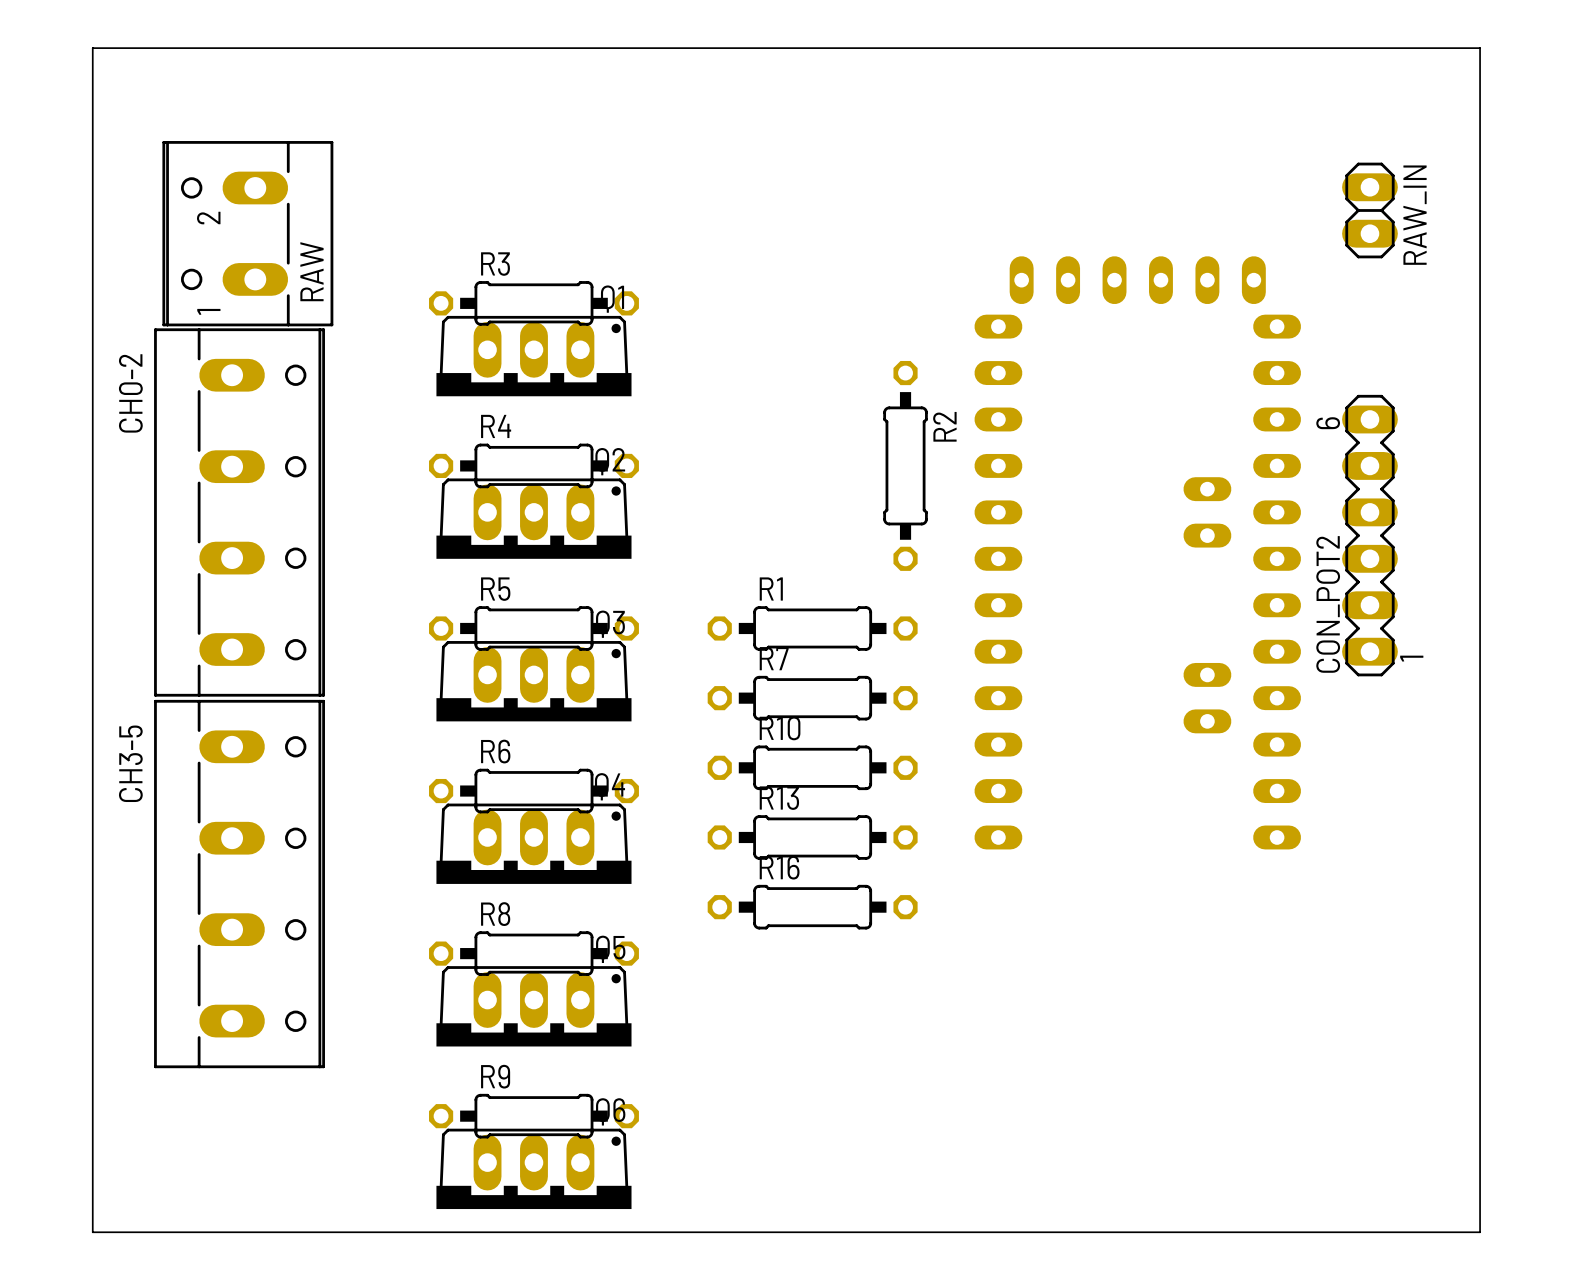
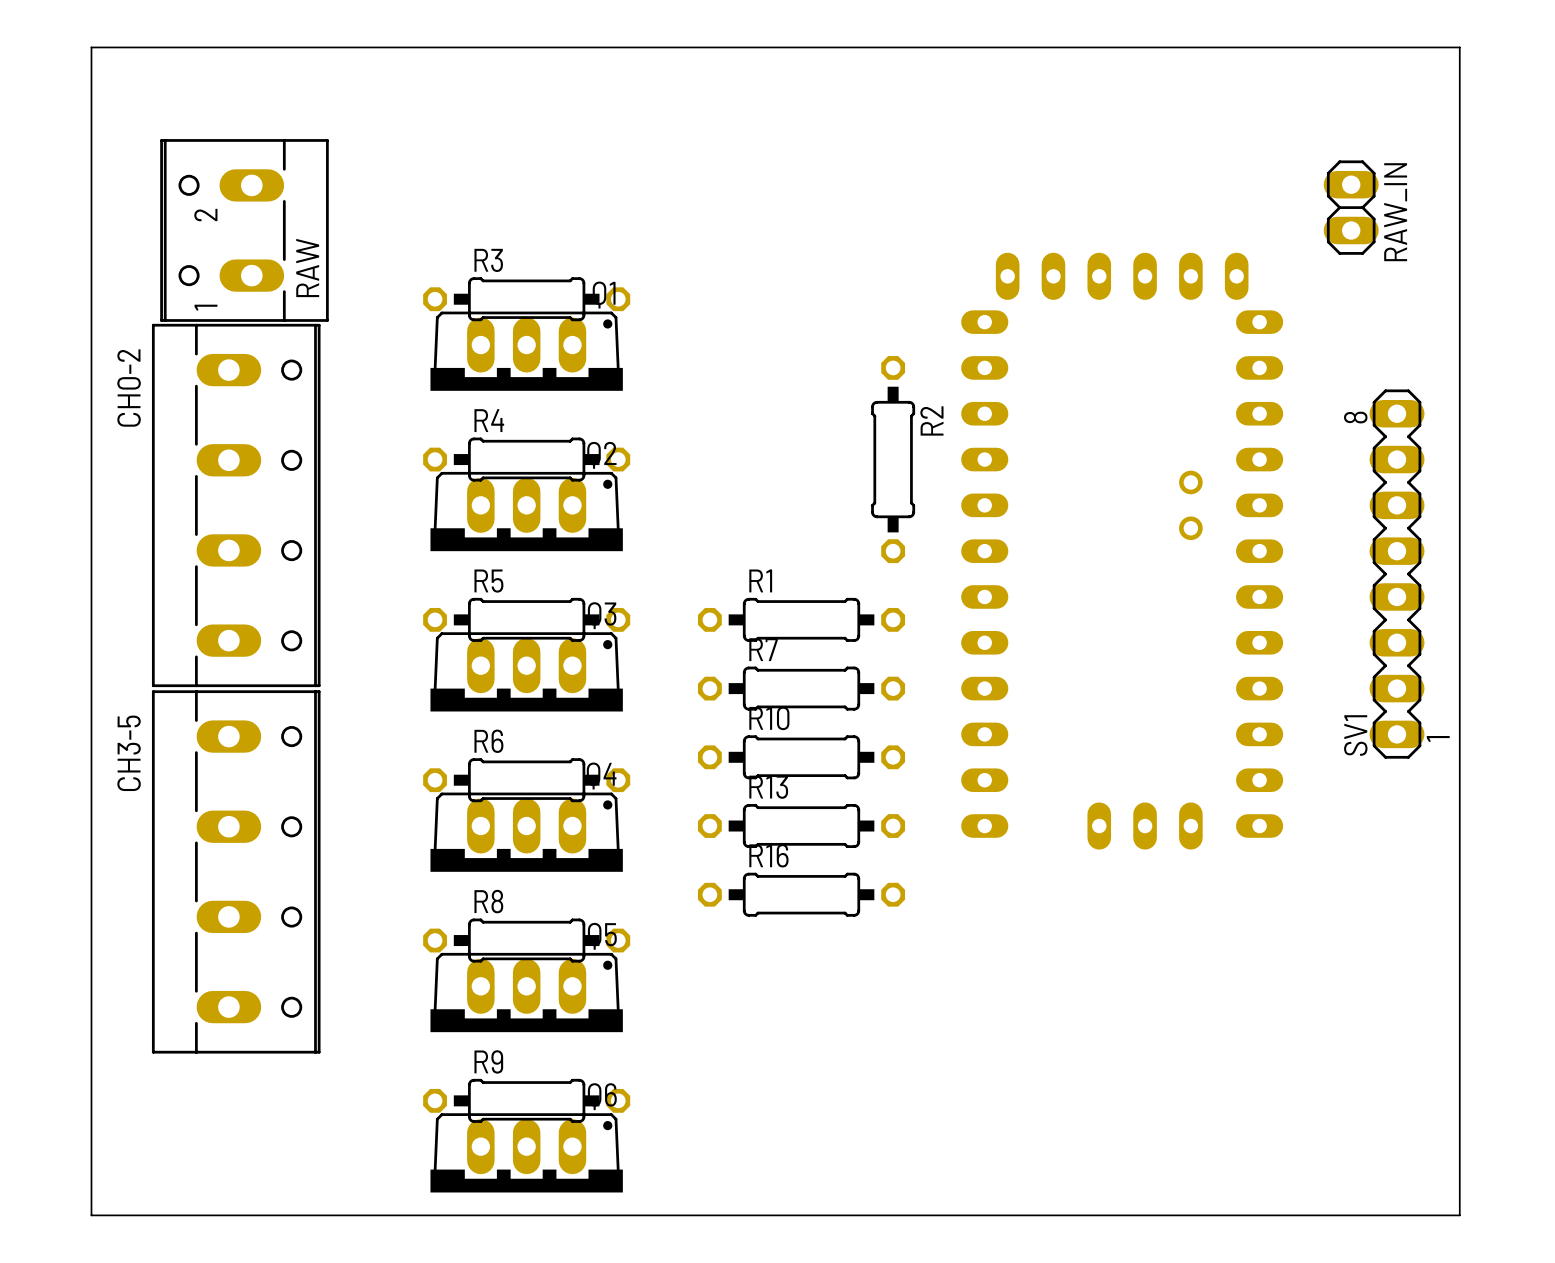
part footprint: [974, 256, 1302, 850] -> [961, 252, 1284, 850]
CON_POT2: (1369, 535) -> none
SV1: none -> (1397, 574)

